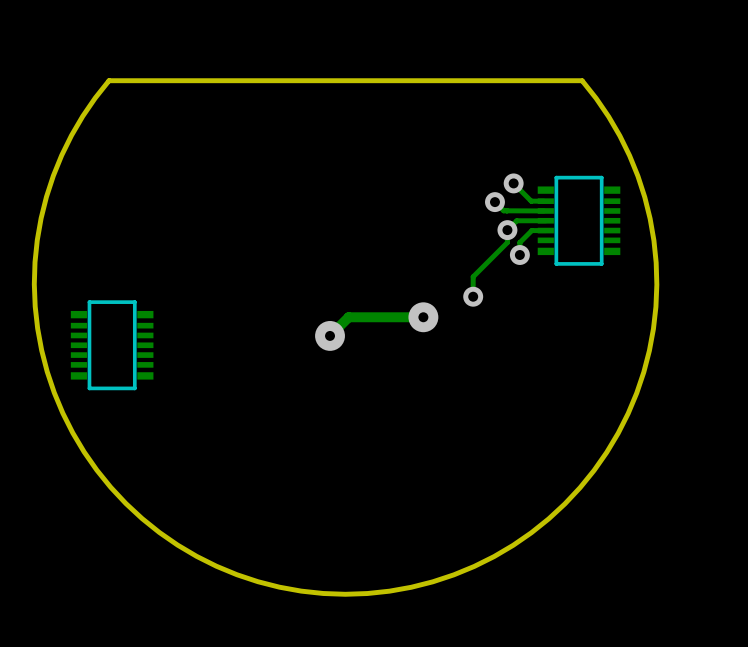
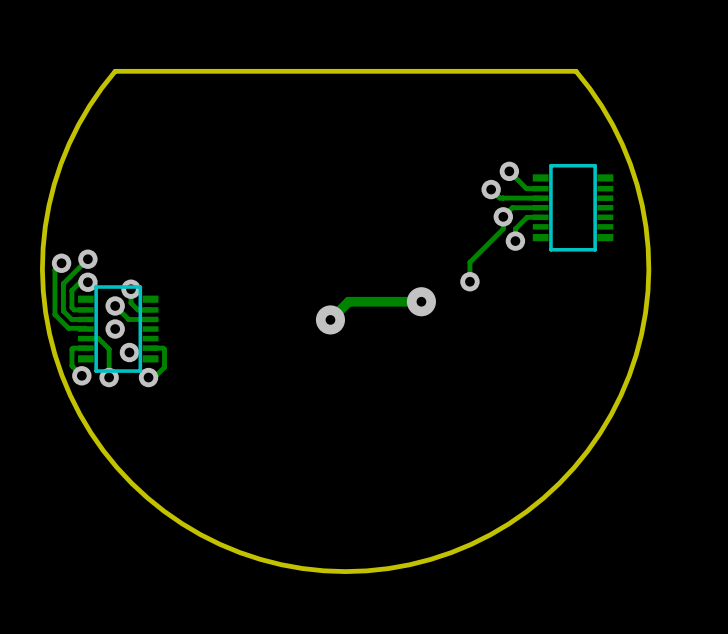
track: none -> (87, 259) (63, 283) (63, 311) (71, 319) (85, 319)
via: none -> (87, 259)
track: none -> (61, 263) (54, 269) (54, 314) (68, 328) (85, 329)
via: none -> (61, 263)
track: none -> (87, 282) (80, 282) (71, 290) (71, 307) (74, 309) (85, 309)
via: none -> (87, 282)
track: none -> (130, 289) (130, 303) (137, 309) (150, 309)
via: none -> (130, 289)
track: none -> (115, 305) (128, 319) (150, 319)
via: none -> (115, 305)
via: none -> (115, 329)
track: none -> (85, 338) (98, 338) (109, 349) (109, 377)
track: none -> (85, 348) (71, 349) (71, 365) (81, 375)
track: none -> (150, 348) (164, 349) (164, 367) (154, 377) (148, 377)
via: none -> (129, 352)
via: none -> (81, 375)
via: none -> (109, 377)
via: none -> (148, 377)

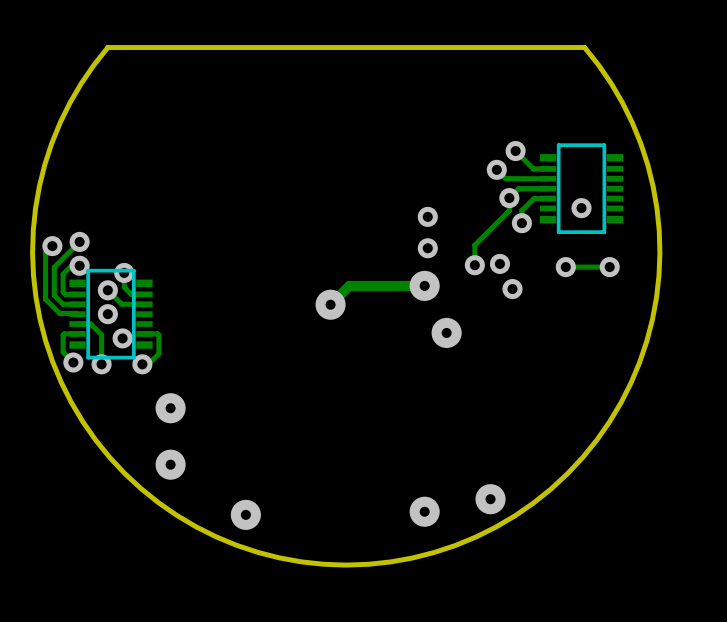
via: none -> (581, 208)
via: none -> (427, 216)
via: none -> (427, 248)
via: none -> (499, 263)
via: none -> (565, 267)
track: none -> (609, 267) (565, 267)
via: none -> (609, 267)
via: none -> (512, 289)
via: none -> (446, 332)
via: none -> (170, 408)
via: none -> (170, 464)
via: none -> (490, 499)
via: none -> (424, 511)
via: none -> (245, 514)

